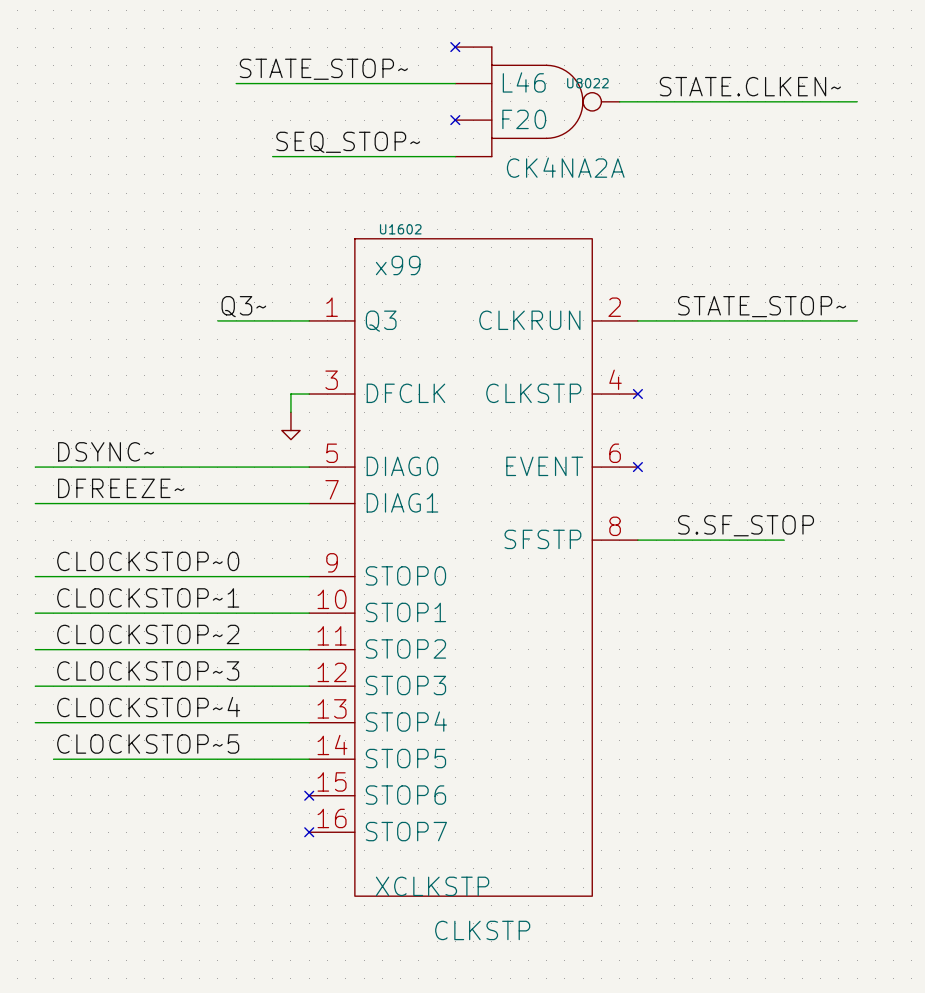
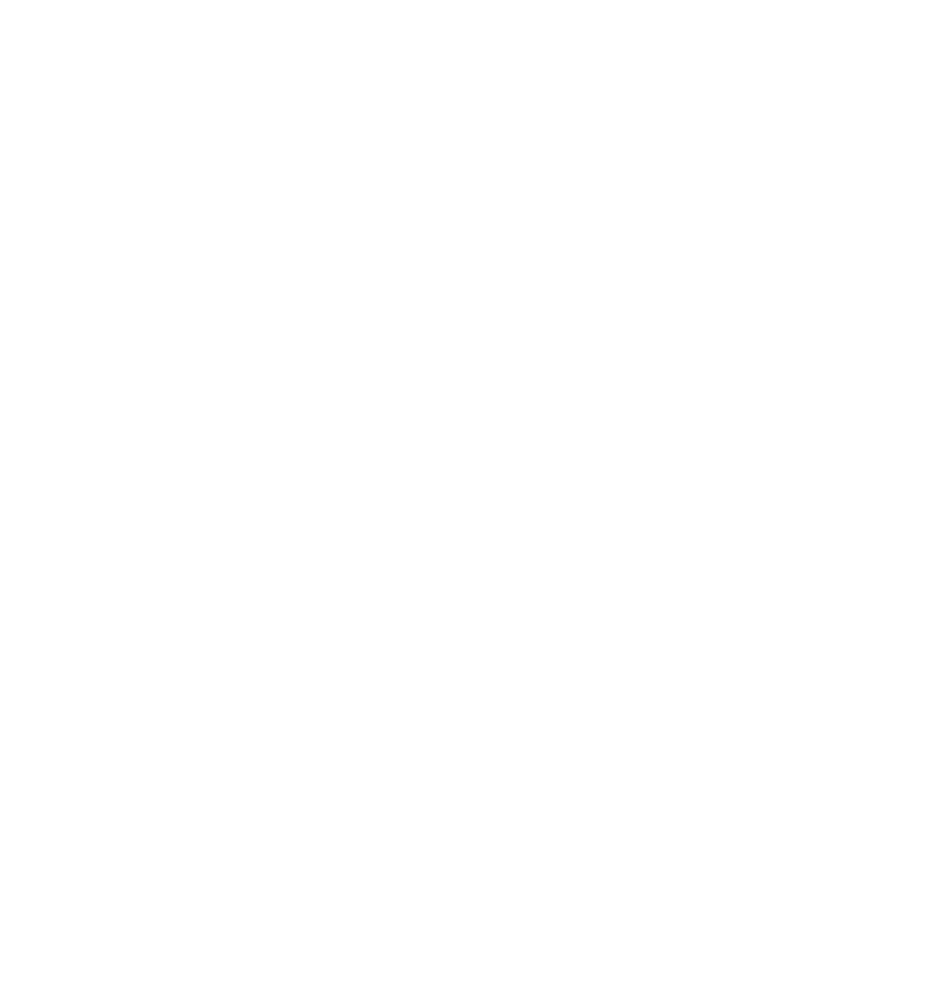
no-connect mark: (455, 47) -> none
label: STATE_STOP~ (323, 69) -> none
wire: (236, 83) (455, 83) -> none
label: STATE.CLKEN~ (750, 86) -> none
U8022: F20 (537, 101) -> none
wire: (619, 101) (857, 101) -> none
no-connect mark: (455, 120) -> none
label: SEQ_STOP~ (348, 142) -> none
wire: (272, 156) (455, 156) -> none
label: Q3~ (243, 306) -> none
label: STATE_STOP~ (762, 306) -> none
wire: (217, 320) (309, 320) -> none
wire: (637, 320) (857, 320) -> none
wire: (309, 394) (290, 394) (290, 412) -> none
no-connect mark: (637, 394) -> none
power symbol: (290, 426) -> none
label: DSYNC~ (106, 451) -> none
wire: (35, 467) (309, 467) -> none
no-connect mark: (637, 467) -> none
label: DFREEZE~ (121, 488) -> none
wire: (35, 503) (309, 503) -> none
label: S.SF_STOP (746, 525) -> none
wire: (637, 540) (784, 540) -> none
label: CLOCKSTOP~0 (148, 561) -> none
U1602: XCLKSTP (473, 567) -> none
wire: (35, 576) (309, 576) -> none
label: CLOCKSTOP~1 (148, 597) -> none
wire: (35, 613) (309, 613) -> none
label: CLOCKSTOP~2 (148, 634) -> none
wire: (35, 649) (309, 649) -> none
label: CLOCKSTOP~3 (148, 670) -> none
wire: (35, 686) (309, 686) -> none
label: CLOCKSTOP~4 (148, 707) -> none
wire: (35, 722) (309, 722) -> none
label: CLOCKSTOP~5 (148, 744) -> none
wire: (53, 759) (309, 759) -> none
no-connect mark: (309, 795) -> none
no-connect mark: (309, 832) -> none

